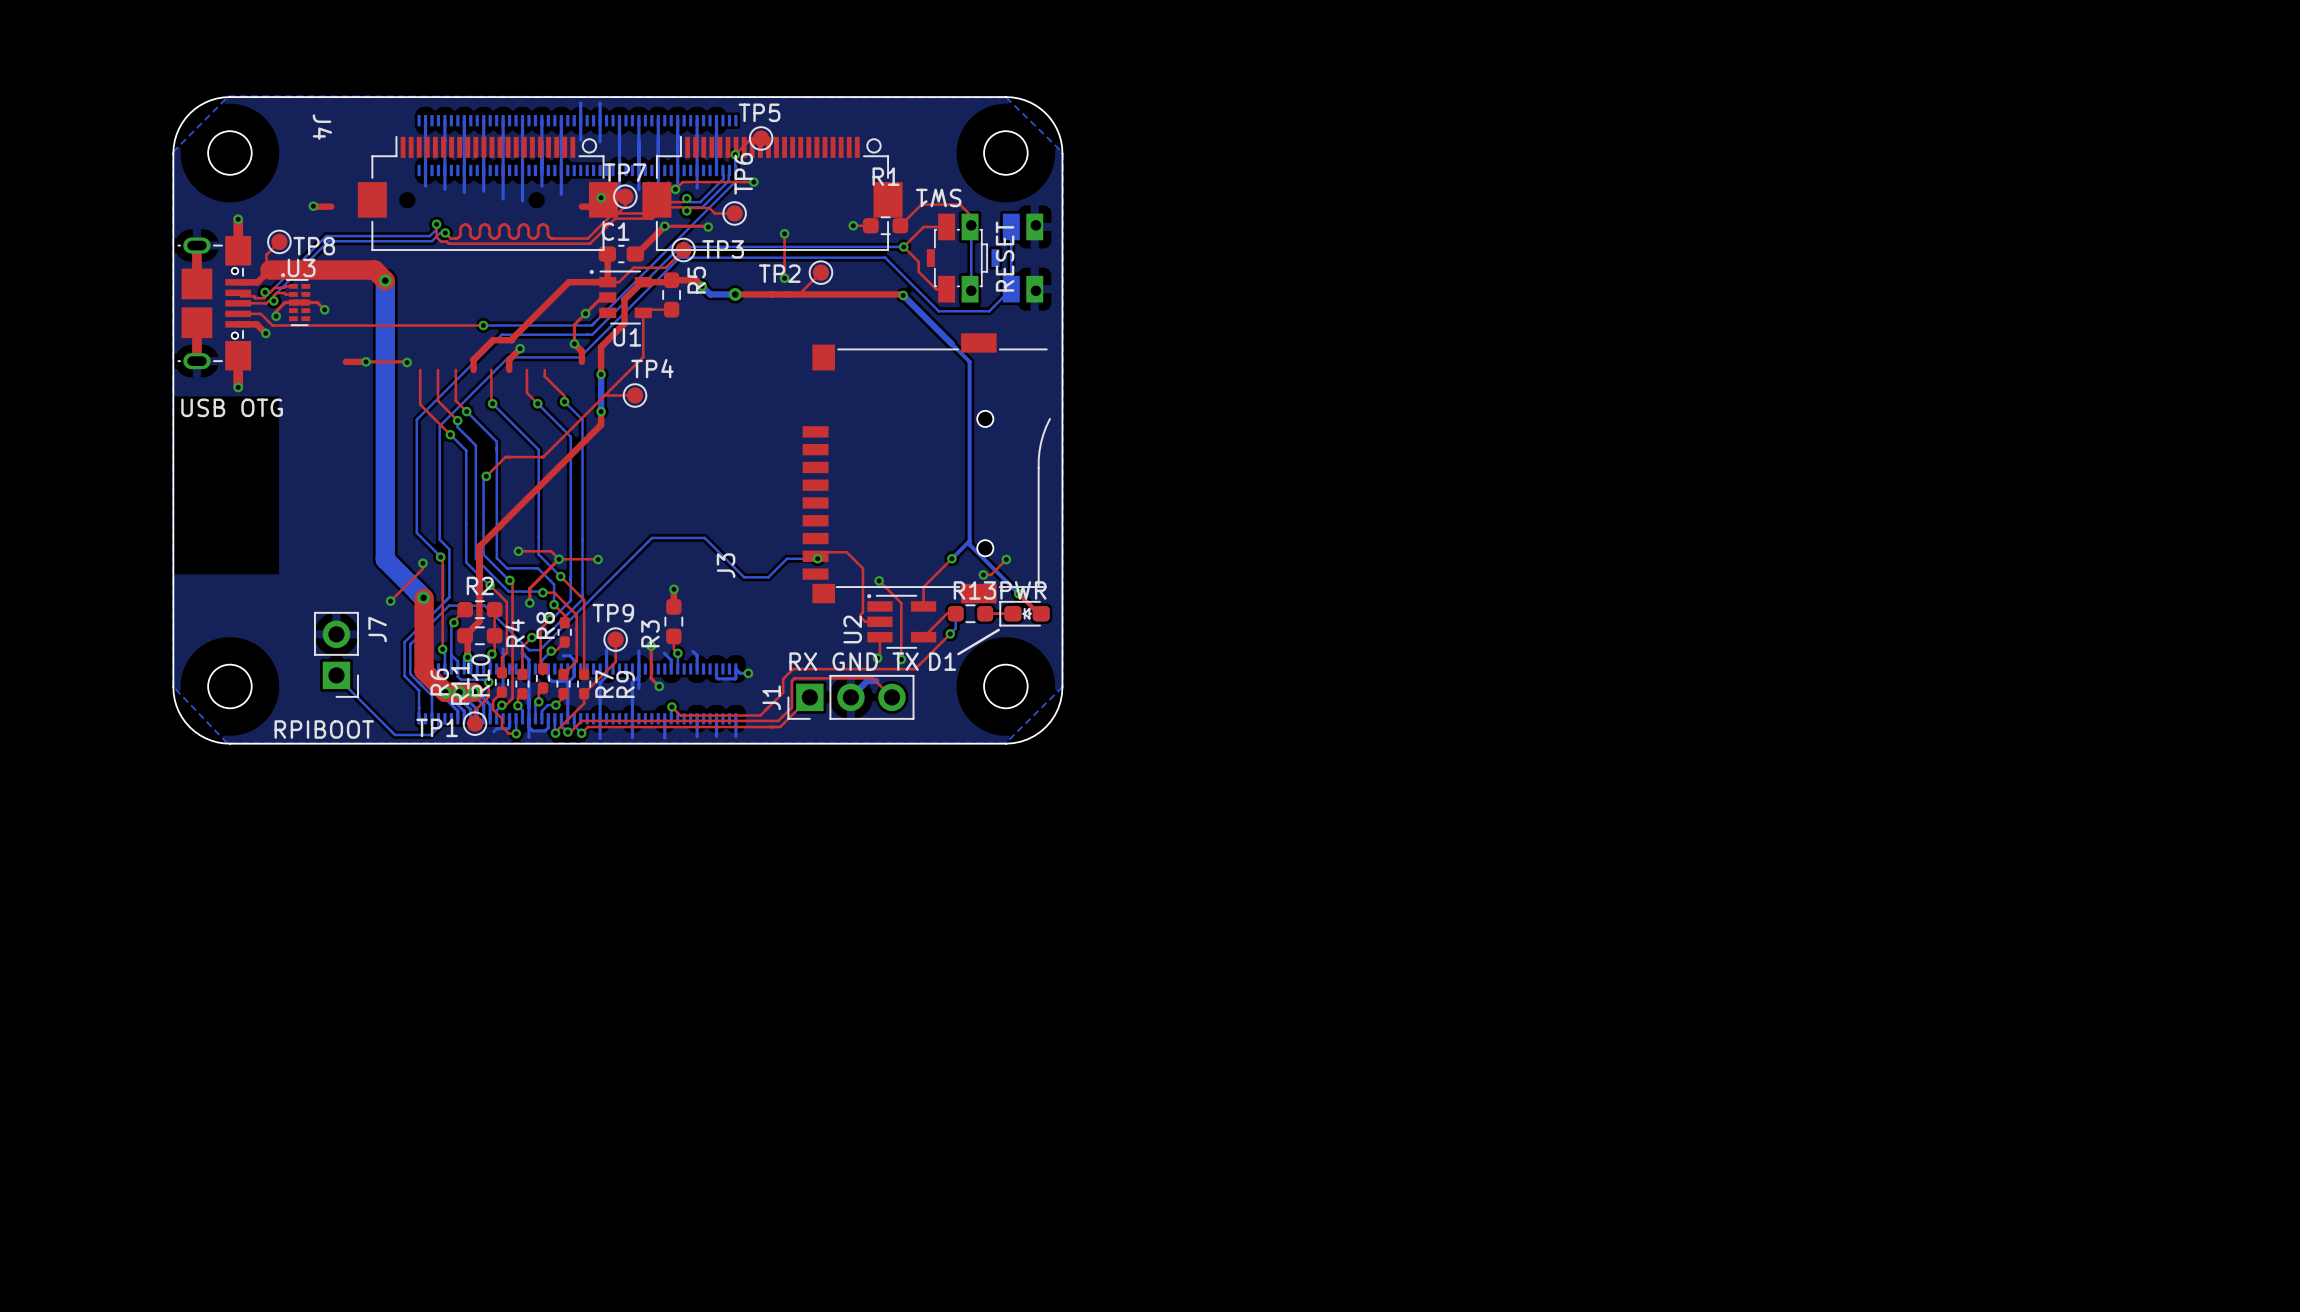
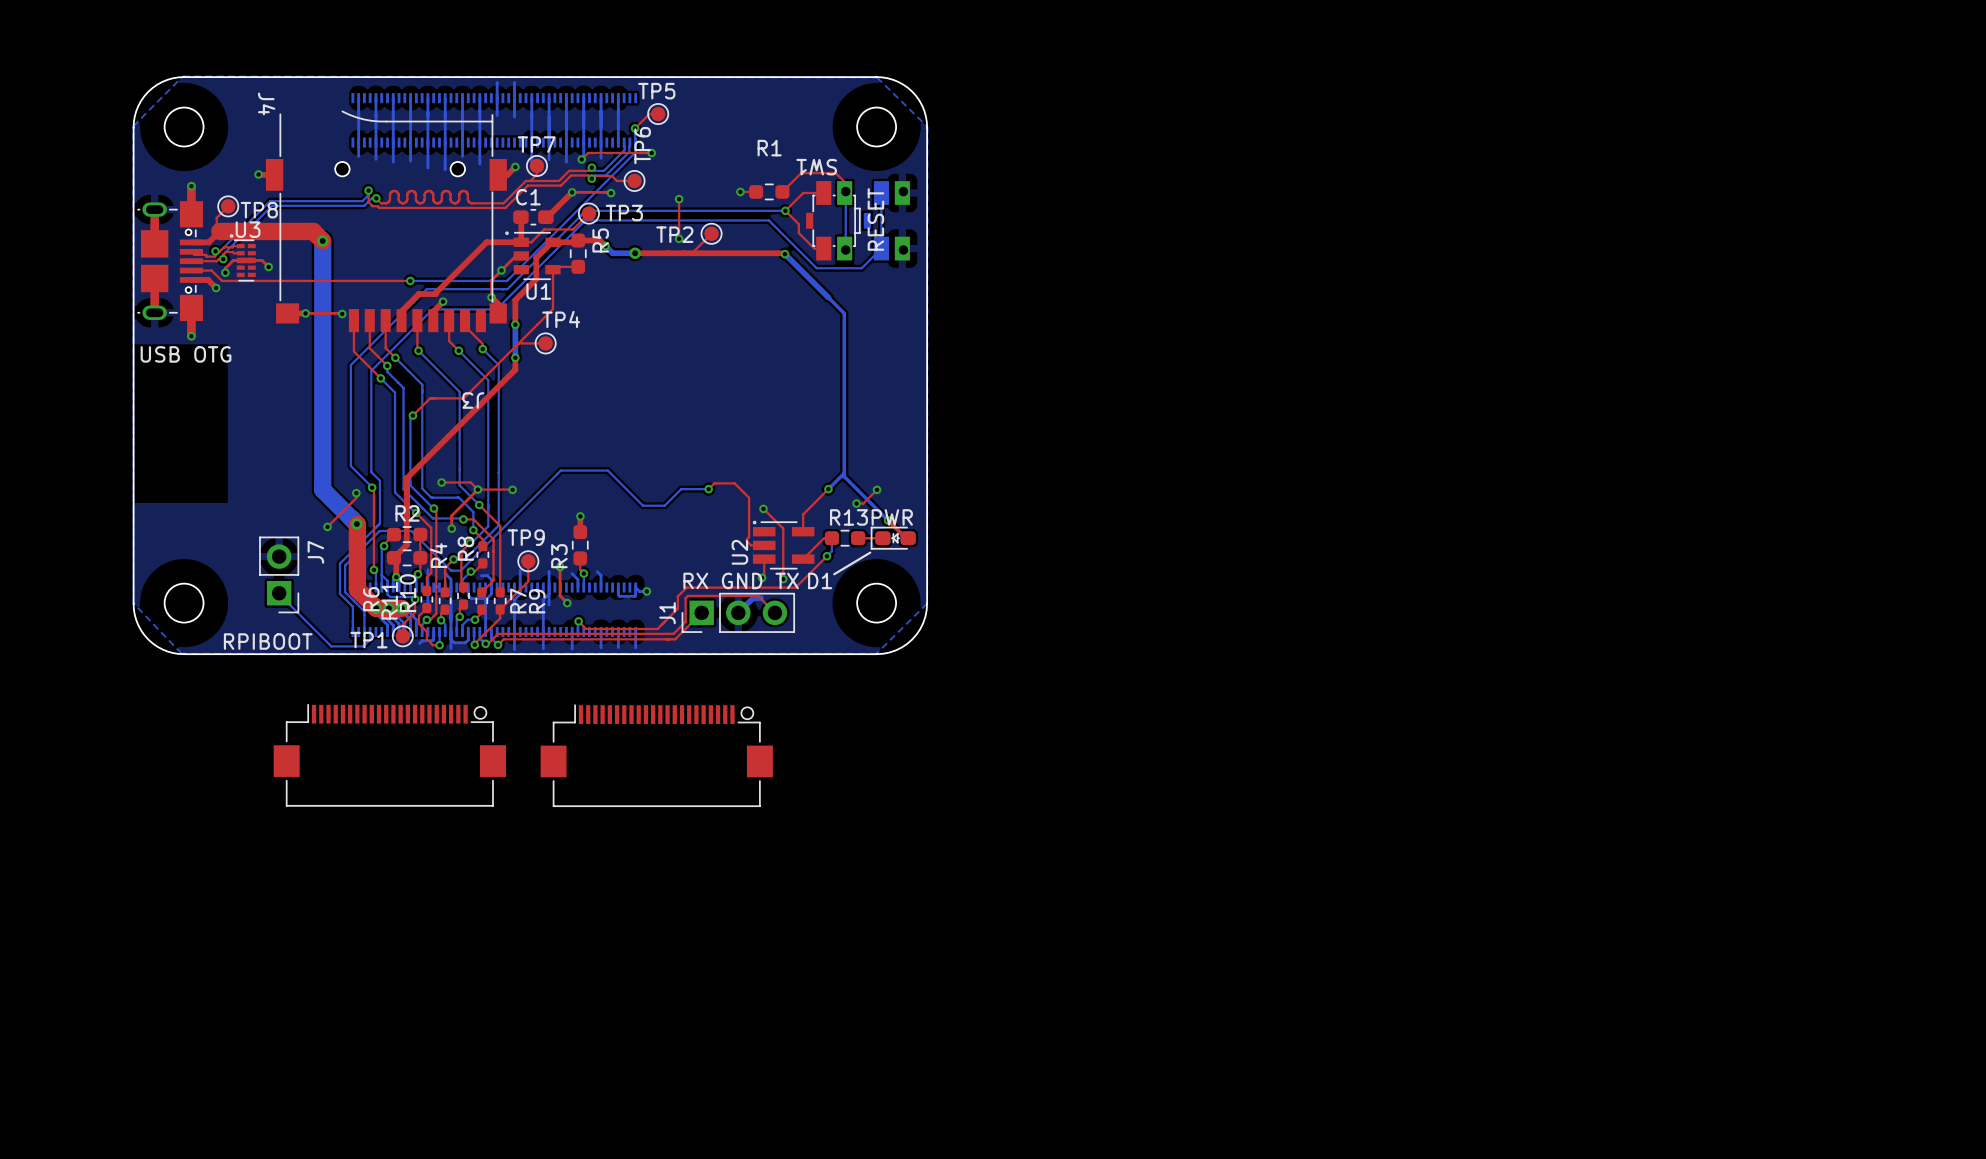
part: (487, 193) -> none
part: (772, 193) -> none
J3 rotation: 0° (926, 468) -> 90° counterclockwise (386, 221)
J3 position: (926, 468) -> (386, 221)
part: none -> (389, 755)
part: none -> (656, 755)

